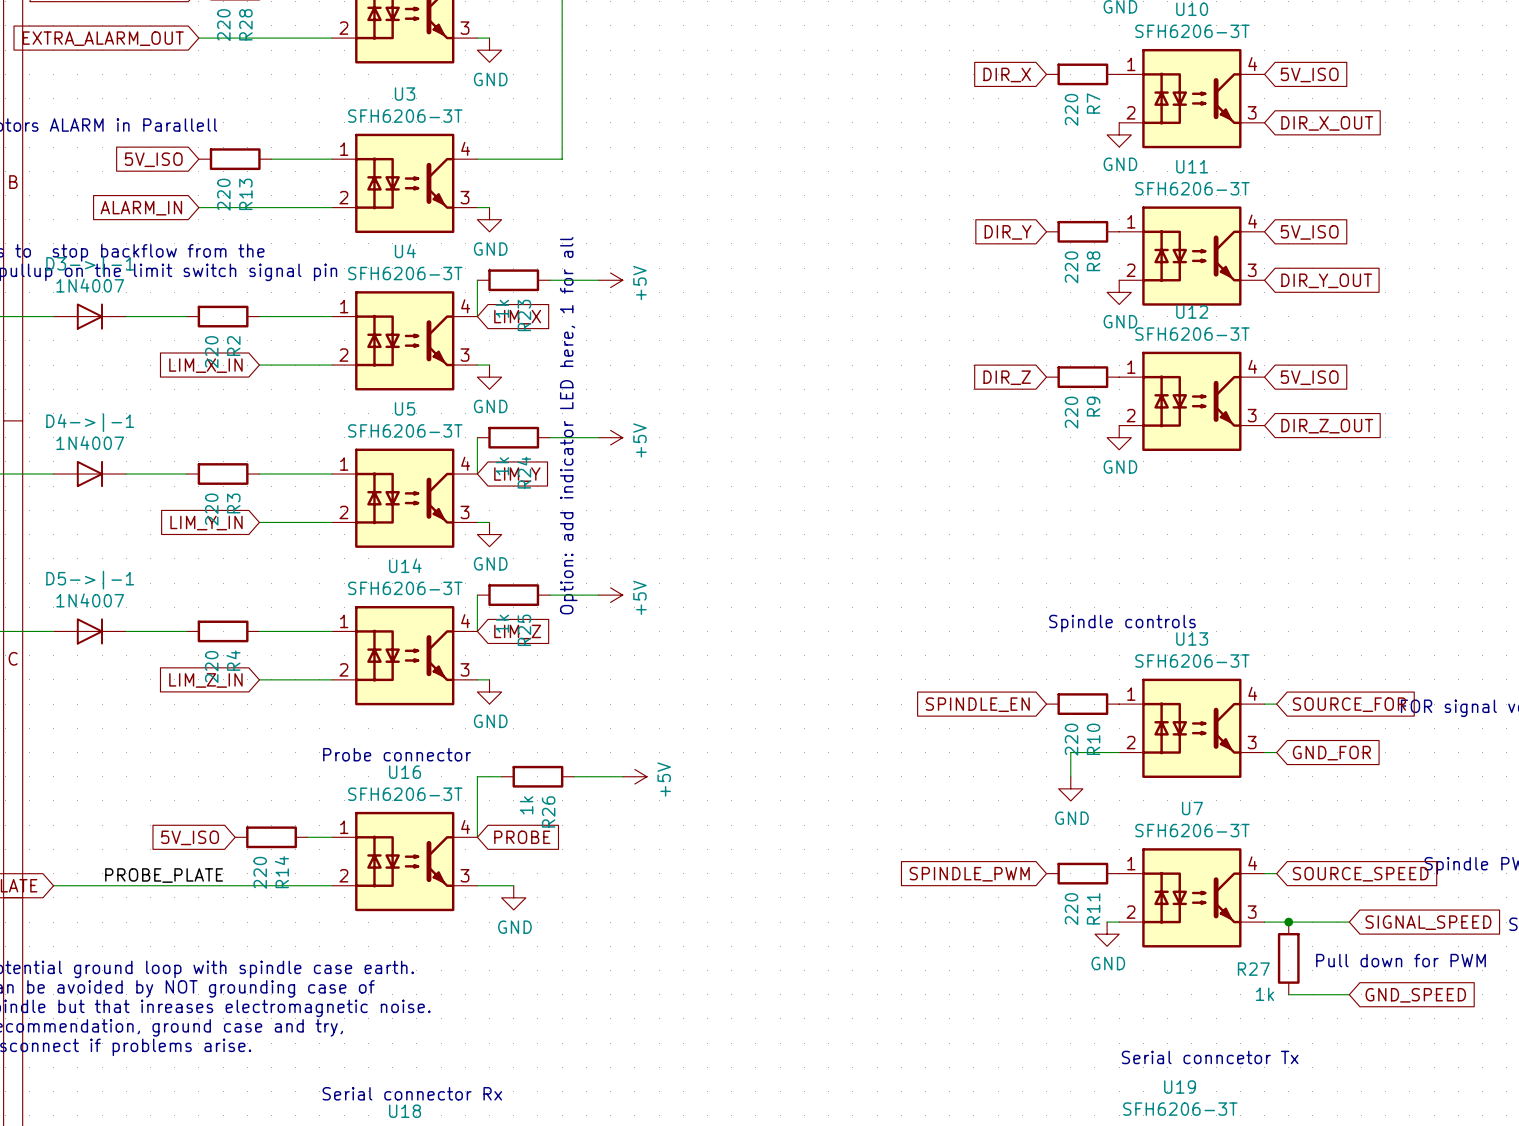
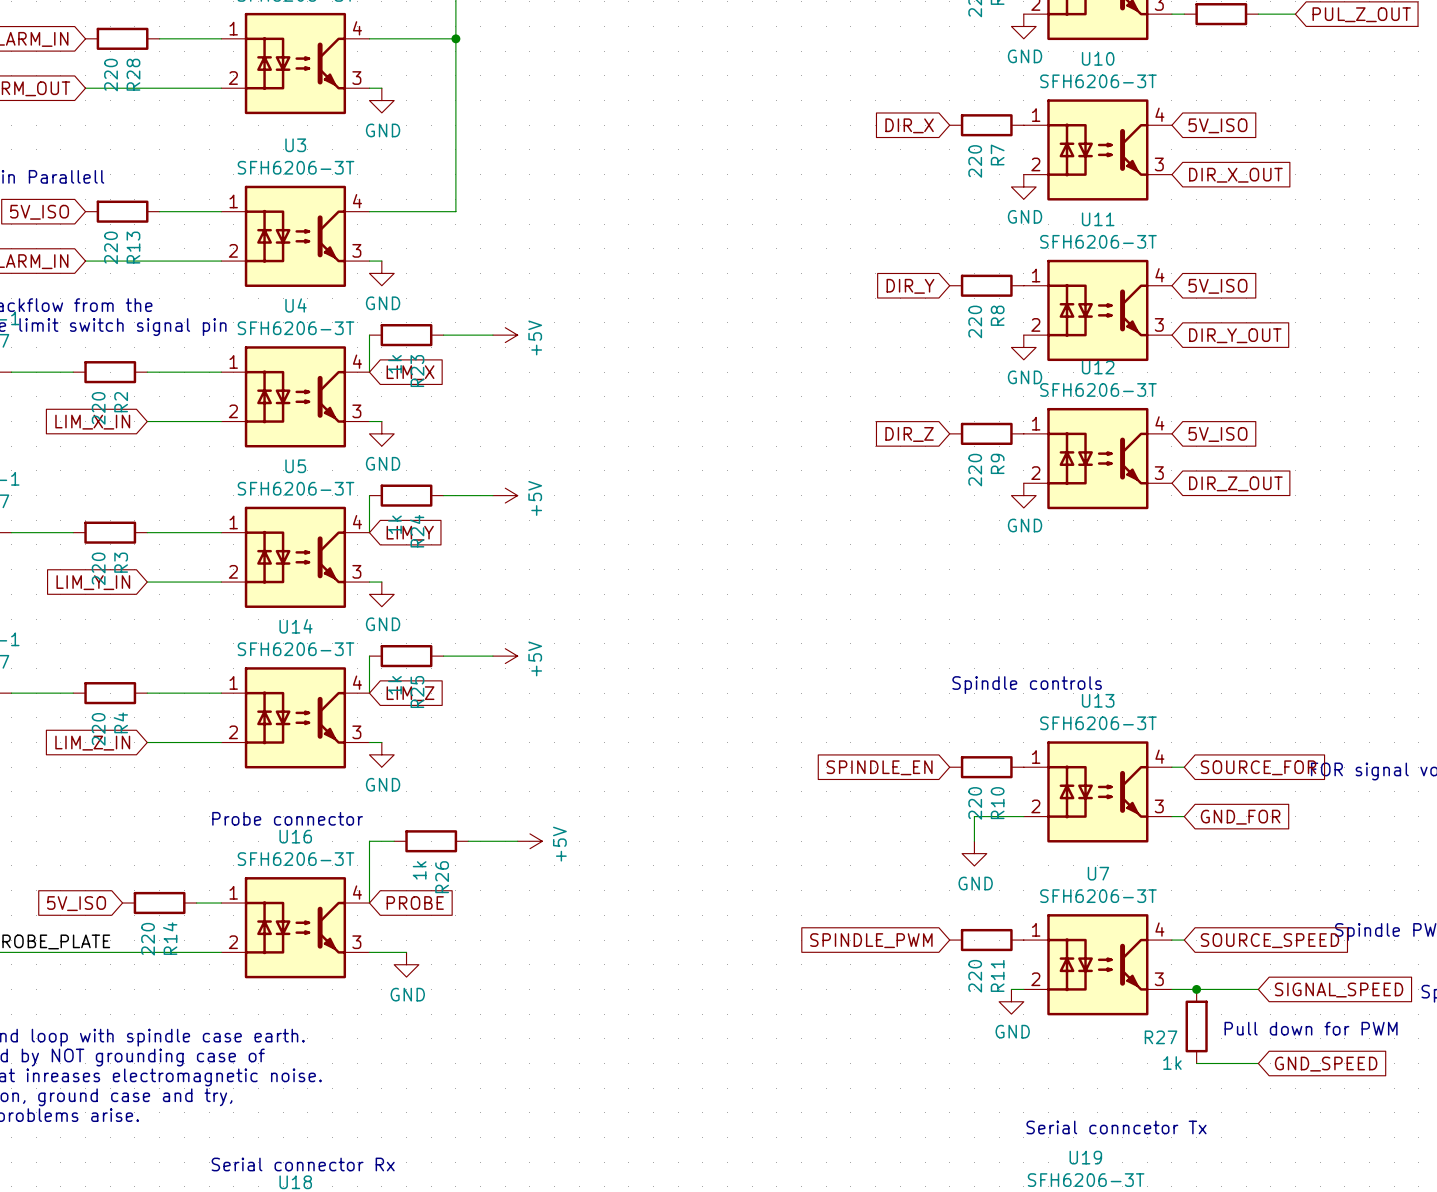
text: Option: add indicator LED here, 1 for all (568, 425) -> none

